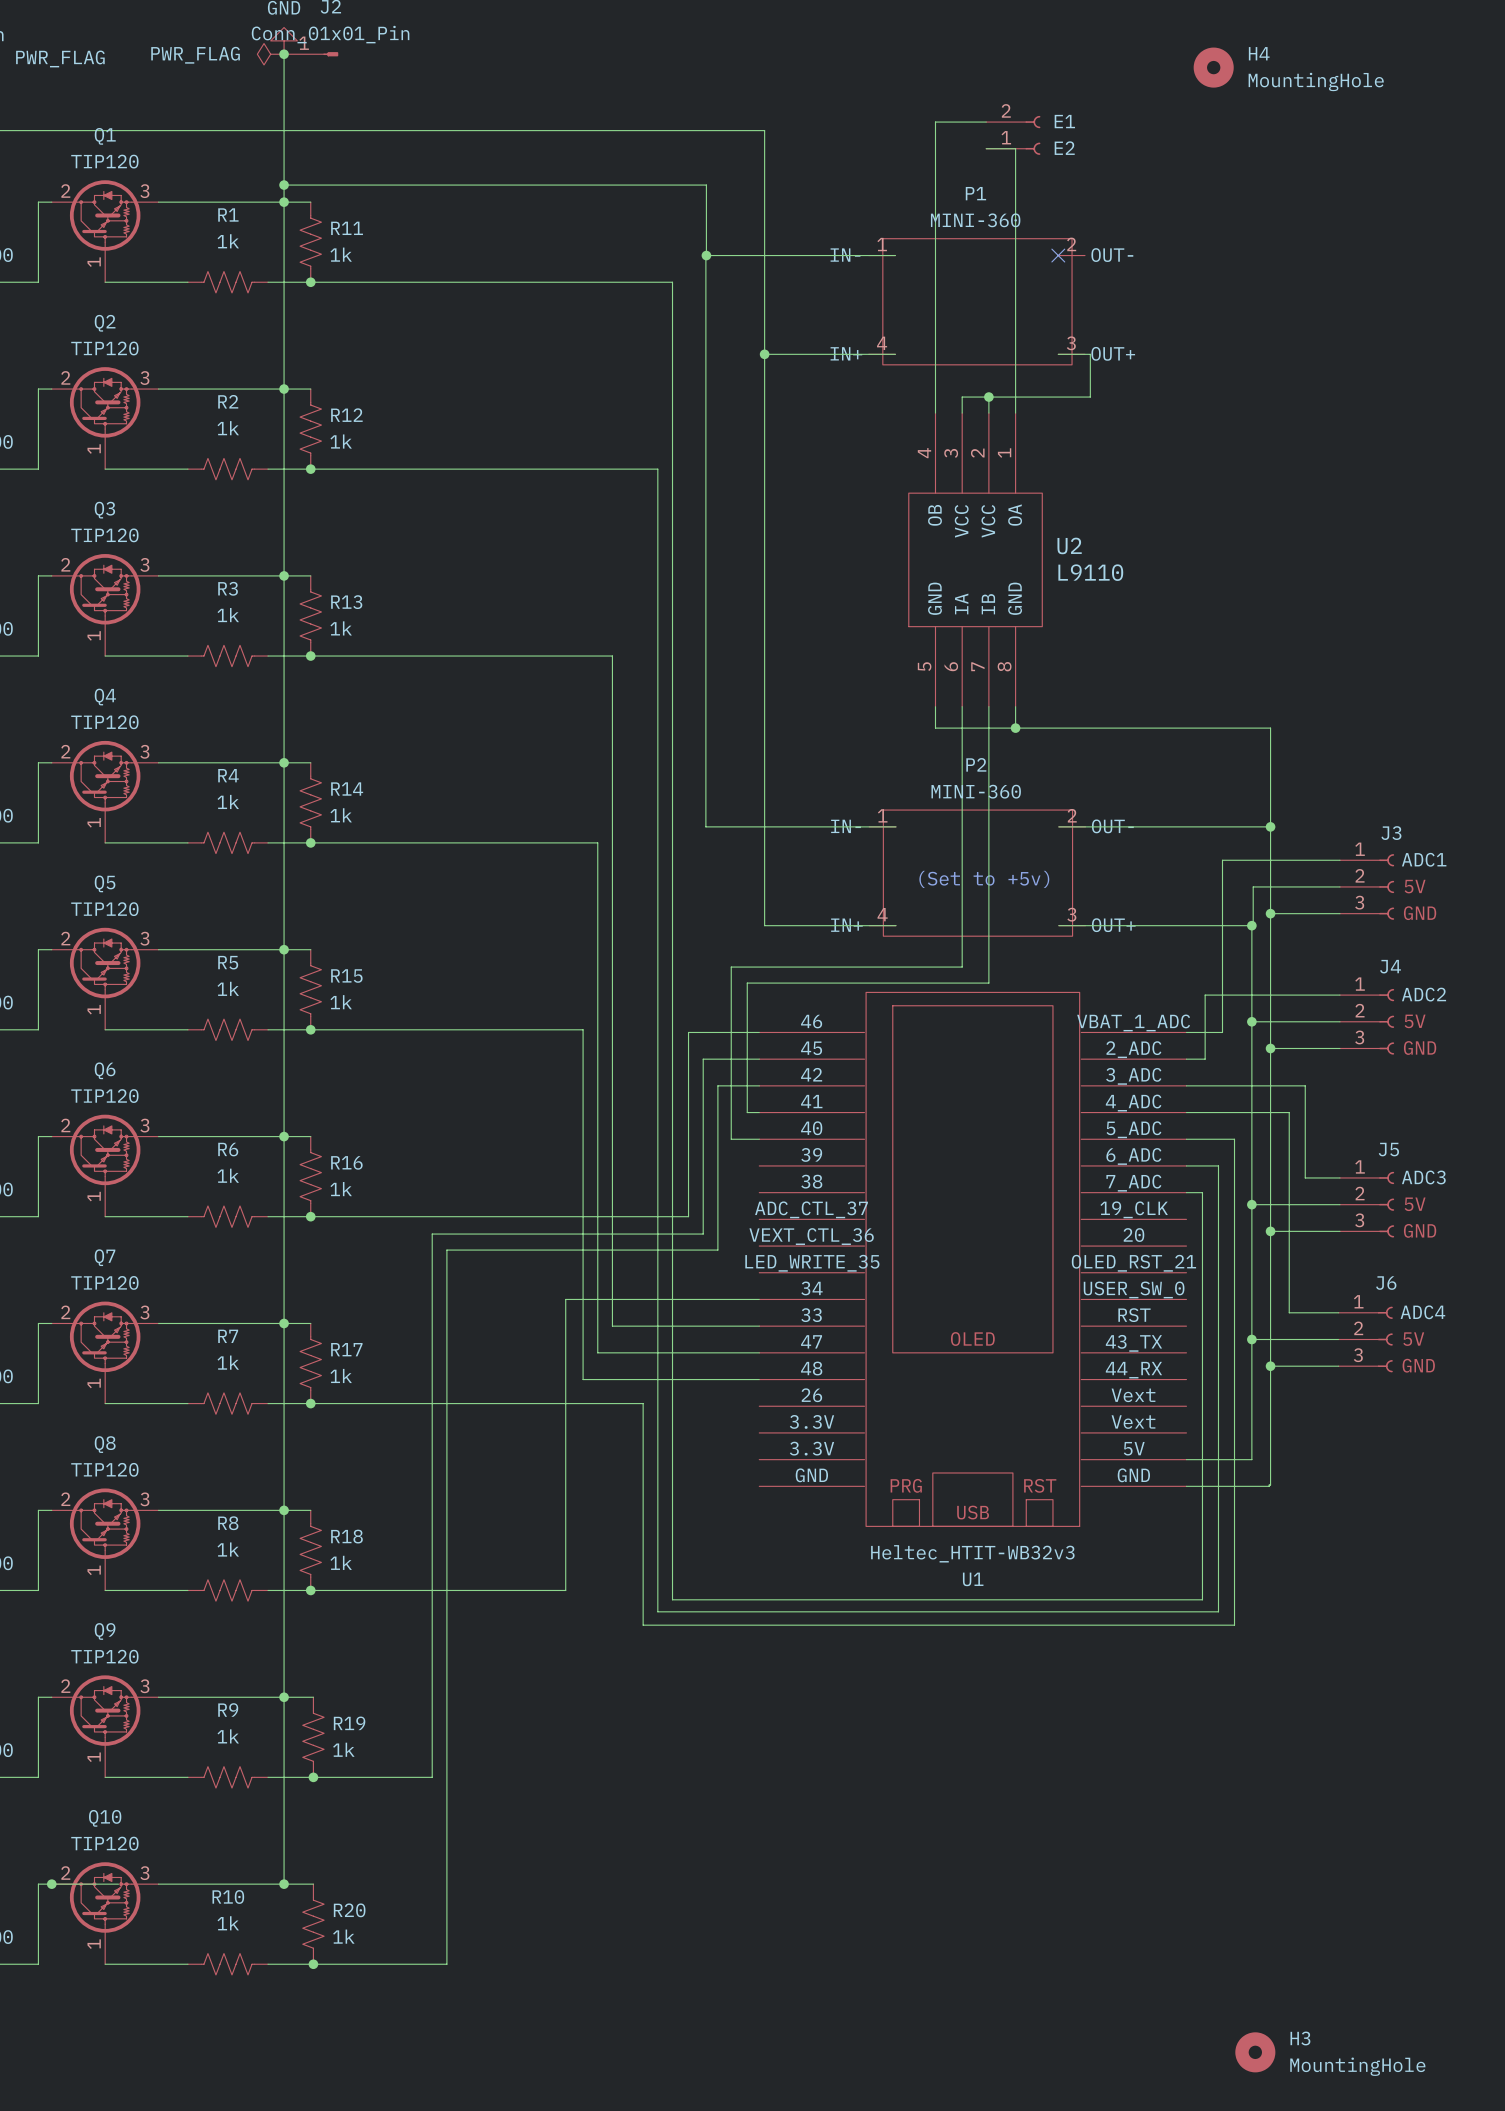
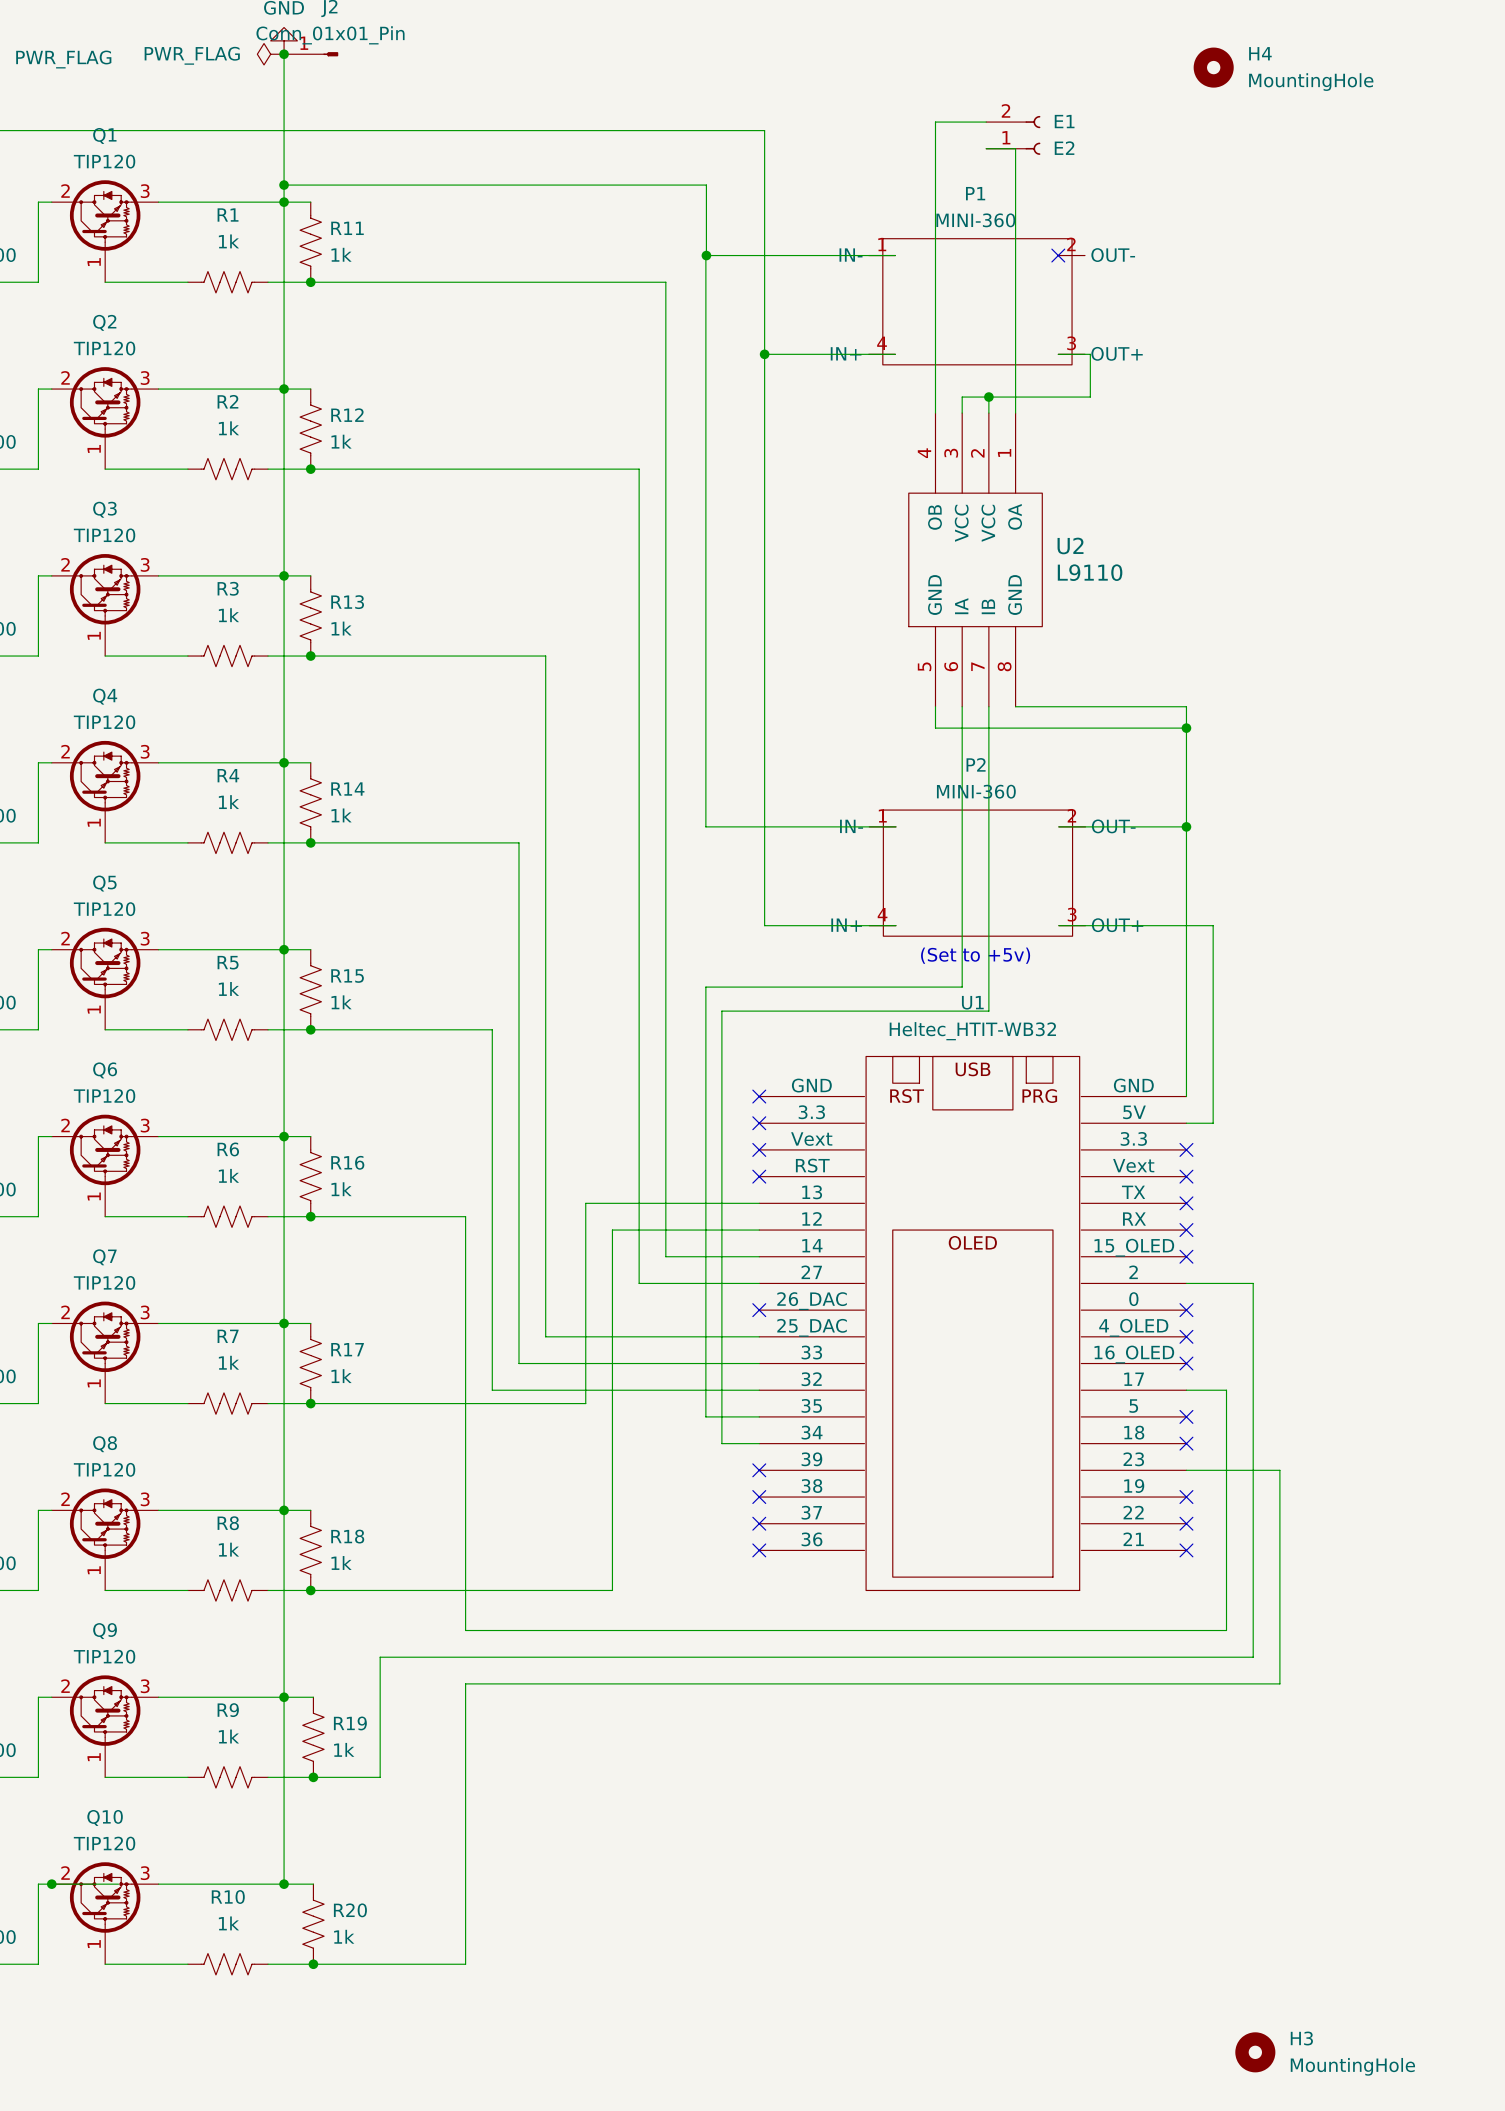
wire: (665, 282) (672, 282) (672, 1599) (1202, 1599) (1202, 1192) (1186, 1192) -> (665, 282) (665, 1256) (759, 1256)
wire: (639, 469) (657, 469) (657, 1611) (1218, 1611) (1218, 1165) (1186, 1165) -> (639, 469) (639, 1283) (759, 1283)
wire: (545, 656) (612, 656) (612, 1230) -> (545, 656) (545, 1336) (759, 1336)
wire: (1015, 706) (1015, 728) -> (1015, 706) (1186, 706) (1186, 1096)
junction: (1015, 728) -> none
wire: (1186, 728) (1270, 728) (1270, 1485) (1186, 1486) -> none
junction: none -> (1186, 728)
wire: (1186, 826) (1270, 826) -> none
junction: none -> (1186, 826)
junction: (1270, 826) -> none
wire: (518, 842) (597, 842) (597, 1352) (759, 1352) -> (518, 842) (518, 1363) (759, 1363)
wire: (1339, 860) (1222, 860) (1222, 1032) (1186, 1032) -> none
text position: (Set to +5v) (984, 879) -> (Set to +5v) (975, 955)
wire: (1339, 886) (1253, 886) (1253, 925) (1213, 925) -> (1186, 1123) (1213, 1123) (1213, 925)
J3: ADC1 (1367, 886) -> none
wire: (1270, 913) (1339, 913) -> none
junction: (1270, 913) -> none
wire: (1251, 925) (1251, 1459) (1186, 1459) -> none
junction: (1251, 925) -> none
wire: (962, 967) (731, 967) (731, 1139) (759, 1139) -> (962, 967) (962, 987) (705, 987) (705, 1416) (759, 1416)
wire: (988, 983) (747, 983) (747, 1112) (759, 1112) -> (988, 983) (988, 1011) (721, 1011) (721, 1443) (759, 1443)
U1 symbol: [759, 992, 1187, 1527] -> [759, 1056, 1187, 1591]
wire: (1339, 995) (1205, 995) (1205, 1059) (1186, 1059) -> none
wire: (1251, 1021) (1339, 1021) -> none
junction: (1251, 1021) -> none
J4: ADC2 (1367, 1021) -> none
wire: (492, 1029) (583, 1029) (583, 1379) (759, 1379) -> (492, 1029) (492, 1390) (759, 1390)
wire: (759, 1032) (688, 1032) (688, 1216) (465, 1216) -> (1186, 1390) (1226, 1390) (1226, 1630) (465, 1630) (465, 1216)
wire: (1270, 1048) (1339, 1048) -> none
junction: (1270, 1048) -> none
wire: (759, 1059) (703, 1059) (703, 1234) (432, 1234) (432, 1777) (380, 1777) -> (1186, 1283) (1253, 1283) (1253, 1657) (380, 1657) (380, 1777)
wire: (759, 1085) (717, 1085) (717, 1250) (446, 1250) (446, 1964) -> (1186, 1470) (1279, 1470) (1279, 1683) (465, 1683) (465, 1964) (446, 1964)
wire: (1186, 1085) (1305, 1085) (1305, 1177) (1339, 1177) -> none
no-connect mark: none -> (759, 1096)
wire: (1186, 1112) (1289, 1112) (1289, 1312) (1338, 1312) -> none
no-connect mark: none -> (759, 1123)
wire: (1186, 1139) (1234, 1139) (1234, 1625) (643, 1625) (643, 1403) (585, 1403) -> (759, 1203) (585, 1203) (585, 1403)
no-connect mark: none -> (759, 1149)
no-connect mark: none -> (1186, 1149)
no-connect mark: none -> (759, 1176)
no-connect mark: none -> (1186, 1176)
no-connect mark: none -> (1186, 1203)
wire: (1251, 1204) (1339, 1204) -> none
junction: (1251, 1204) -> none
J5: ADC3 (1367, 1204) -> none
no-connect mark: none -> (1186, 1230)
wire: (1270, 1231) (1339, 1231) -> none
junction: (1270, 1231) -> none
no-connect mark: none -> (1186, 1256)
wire: (759, 1299) (565, 1299) (565, 1590) -> (612, 1326) (612, 1590) (565, 1590)
no-connect mark: none -> (759, 1310)
no-connect mark: none -> (1186, 1310)
wire: (612, 1326) (759, 1326) -> (612, 1230) (759, 1230)
no-connect mark: none -> (1186, 1336)
wire: (1251, 1339) (1338, 1339) -> none
junction: (1251, 1339) -> none
J6: ADC4 (1365, 1339) -> none
no-connect mark: none -> (1186, 1363)
wire: (1270, 1366) (1338, 1366) -> none
junction: (1270, 1366) -> none
no-connect mark: none -> (1186, 1416)
no-connect mark: none -> (1186, 1443)
no-connect mark: none -> (759, 1470)
no-connect mark: none -> (759, 1497)
no-connect mark: none -> (1186, 1497)
no-connect mark: none -> (759, 1523)
no-connect mark: none -> (1186, 1523)
no-connect mark: none -> (759, 1550)
no-connect mark: none -> (1186, 1550)
U1 value: Heltec_HTIT-WB32v3 (972, 1553) -> Heltec_HTIT-WB32 (972, 1031)
U1 name position: U1 (973, 1579) -> U1 (972, 1002)

